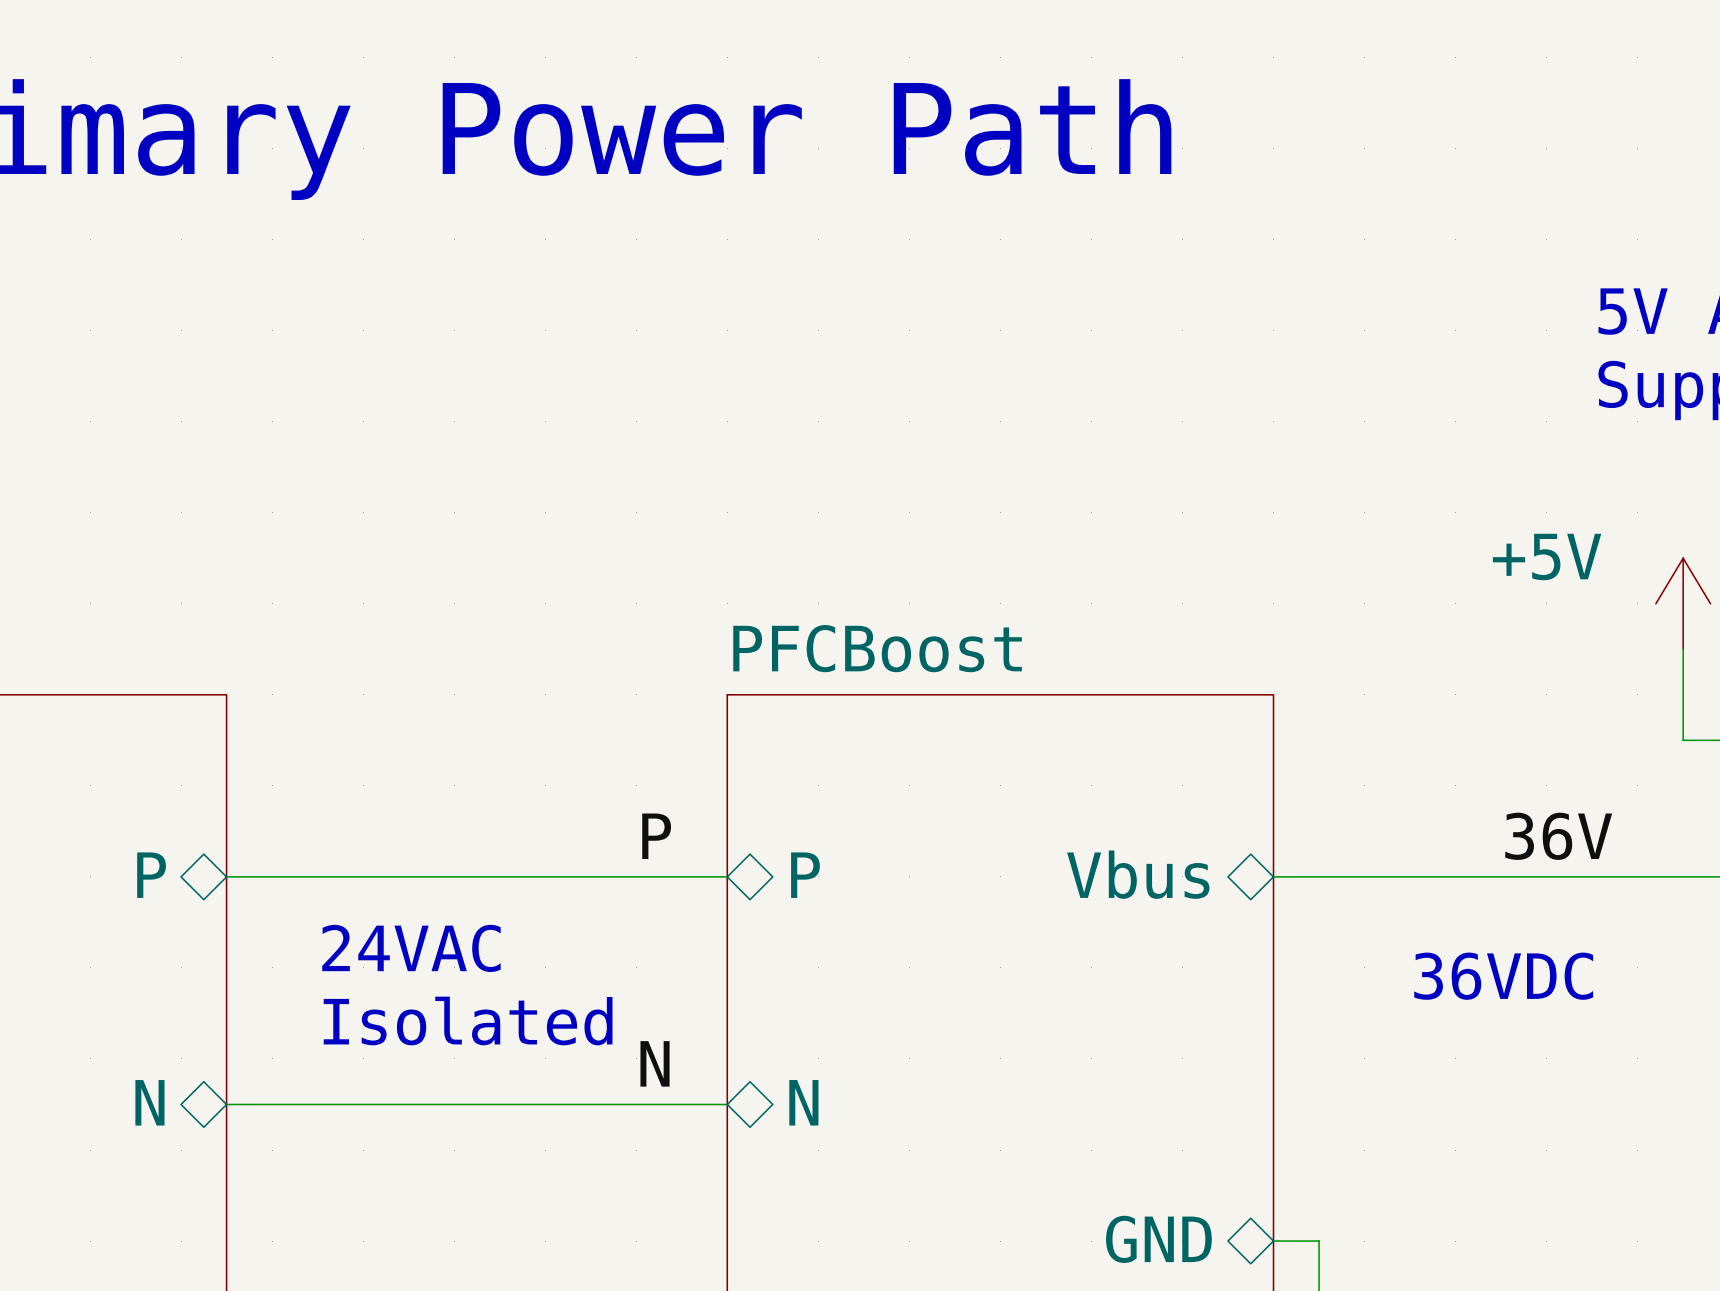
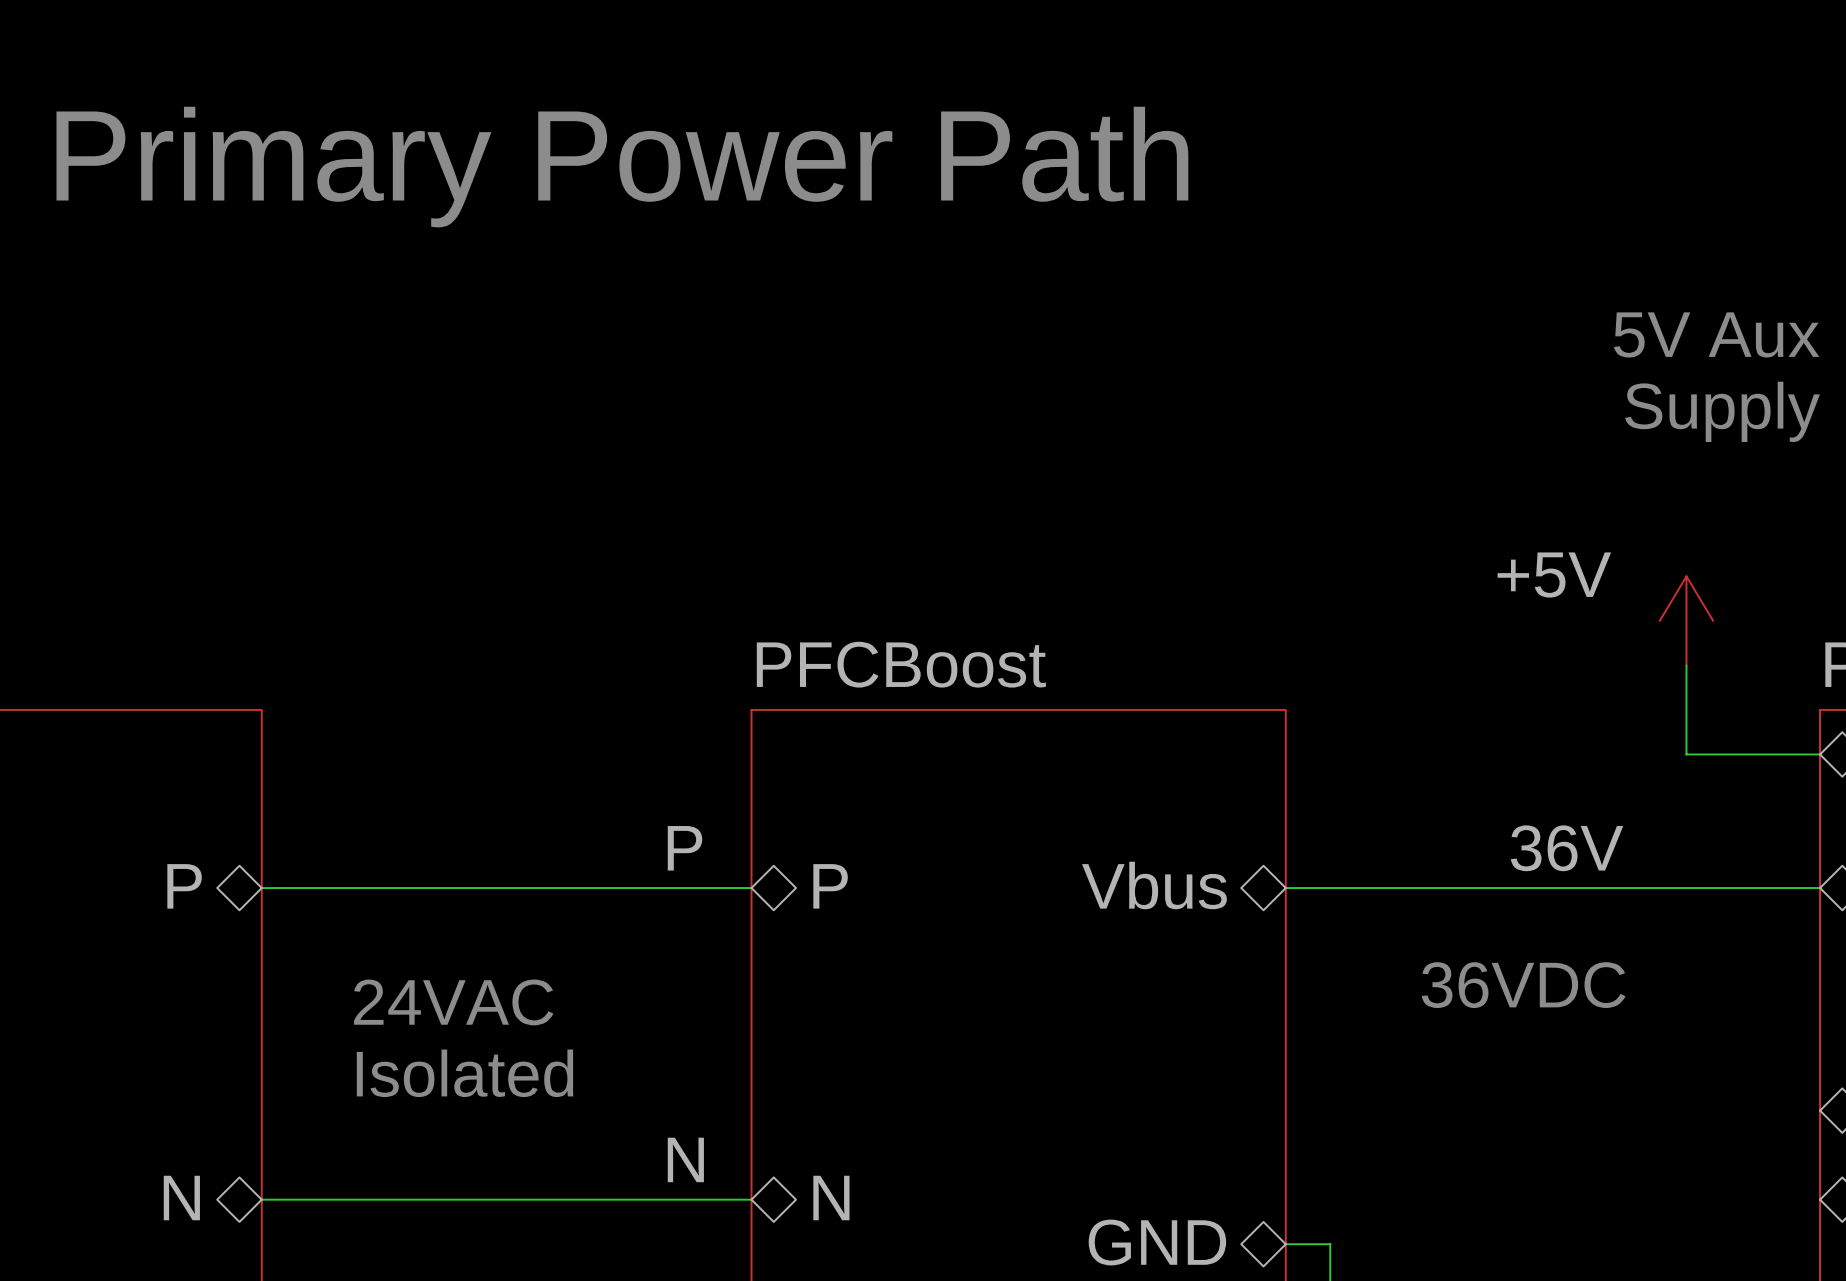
text position: 24VAC (411, 948) -> 24VAC (453, 1002)
text position: Isolated (468, 1020) -> Isolated (465, 1073)
label position: N (655, 1063) -> N (685, 1159)
sheet pin position: N (149, 1102) -> N (181, 1198)
sheet pin position: N (803, 1102) -> N (831, 1198)
wire: (226, 1104) (727, 1104) -> (261, 1199) (751, 1199)

